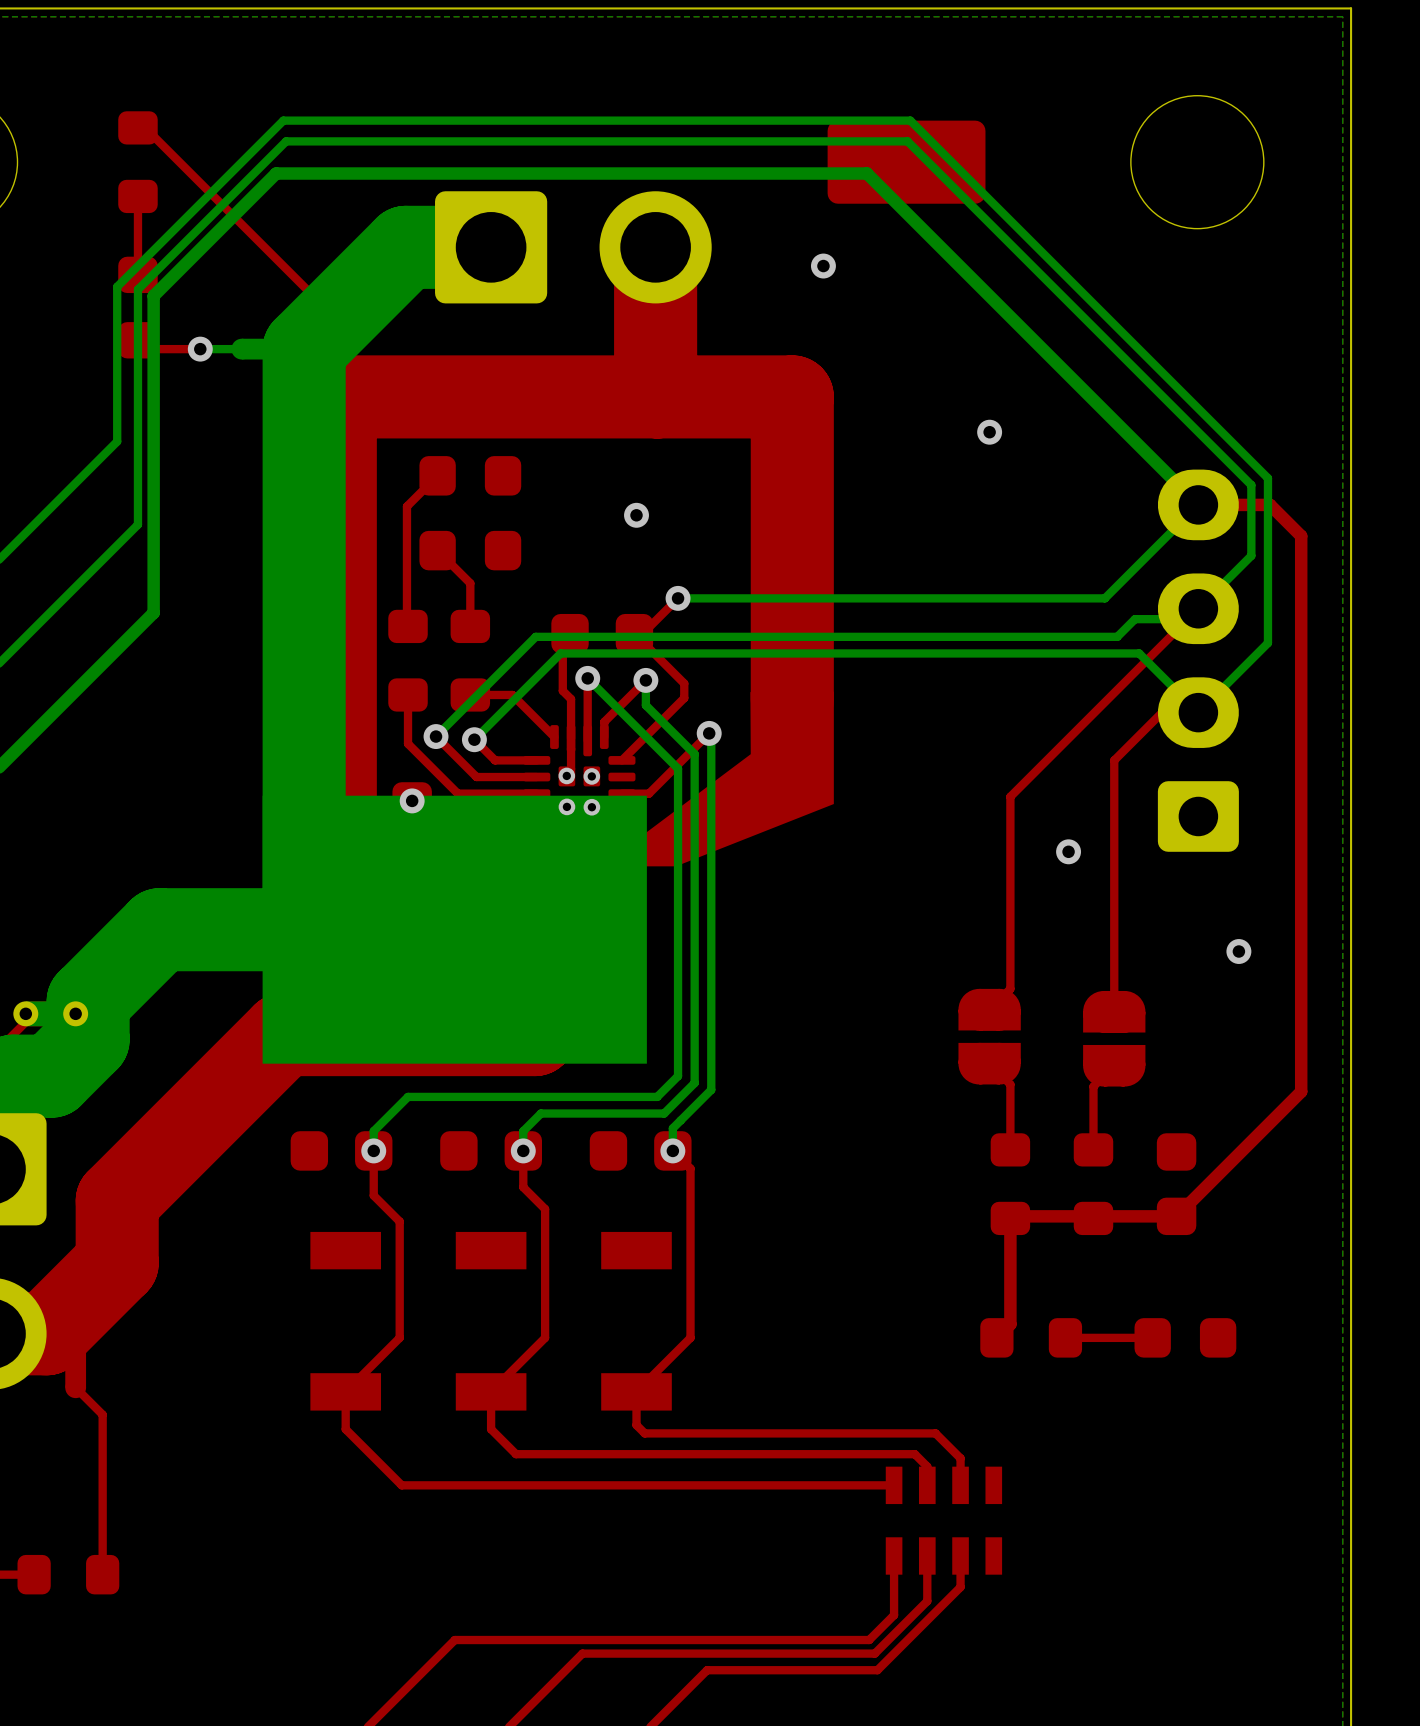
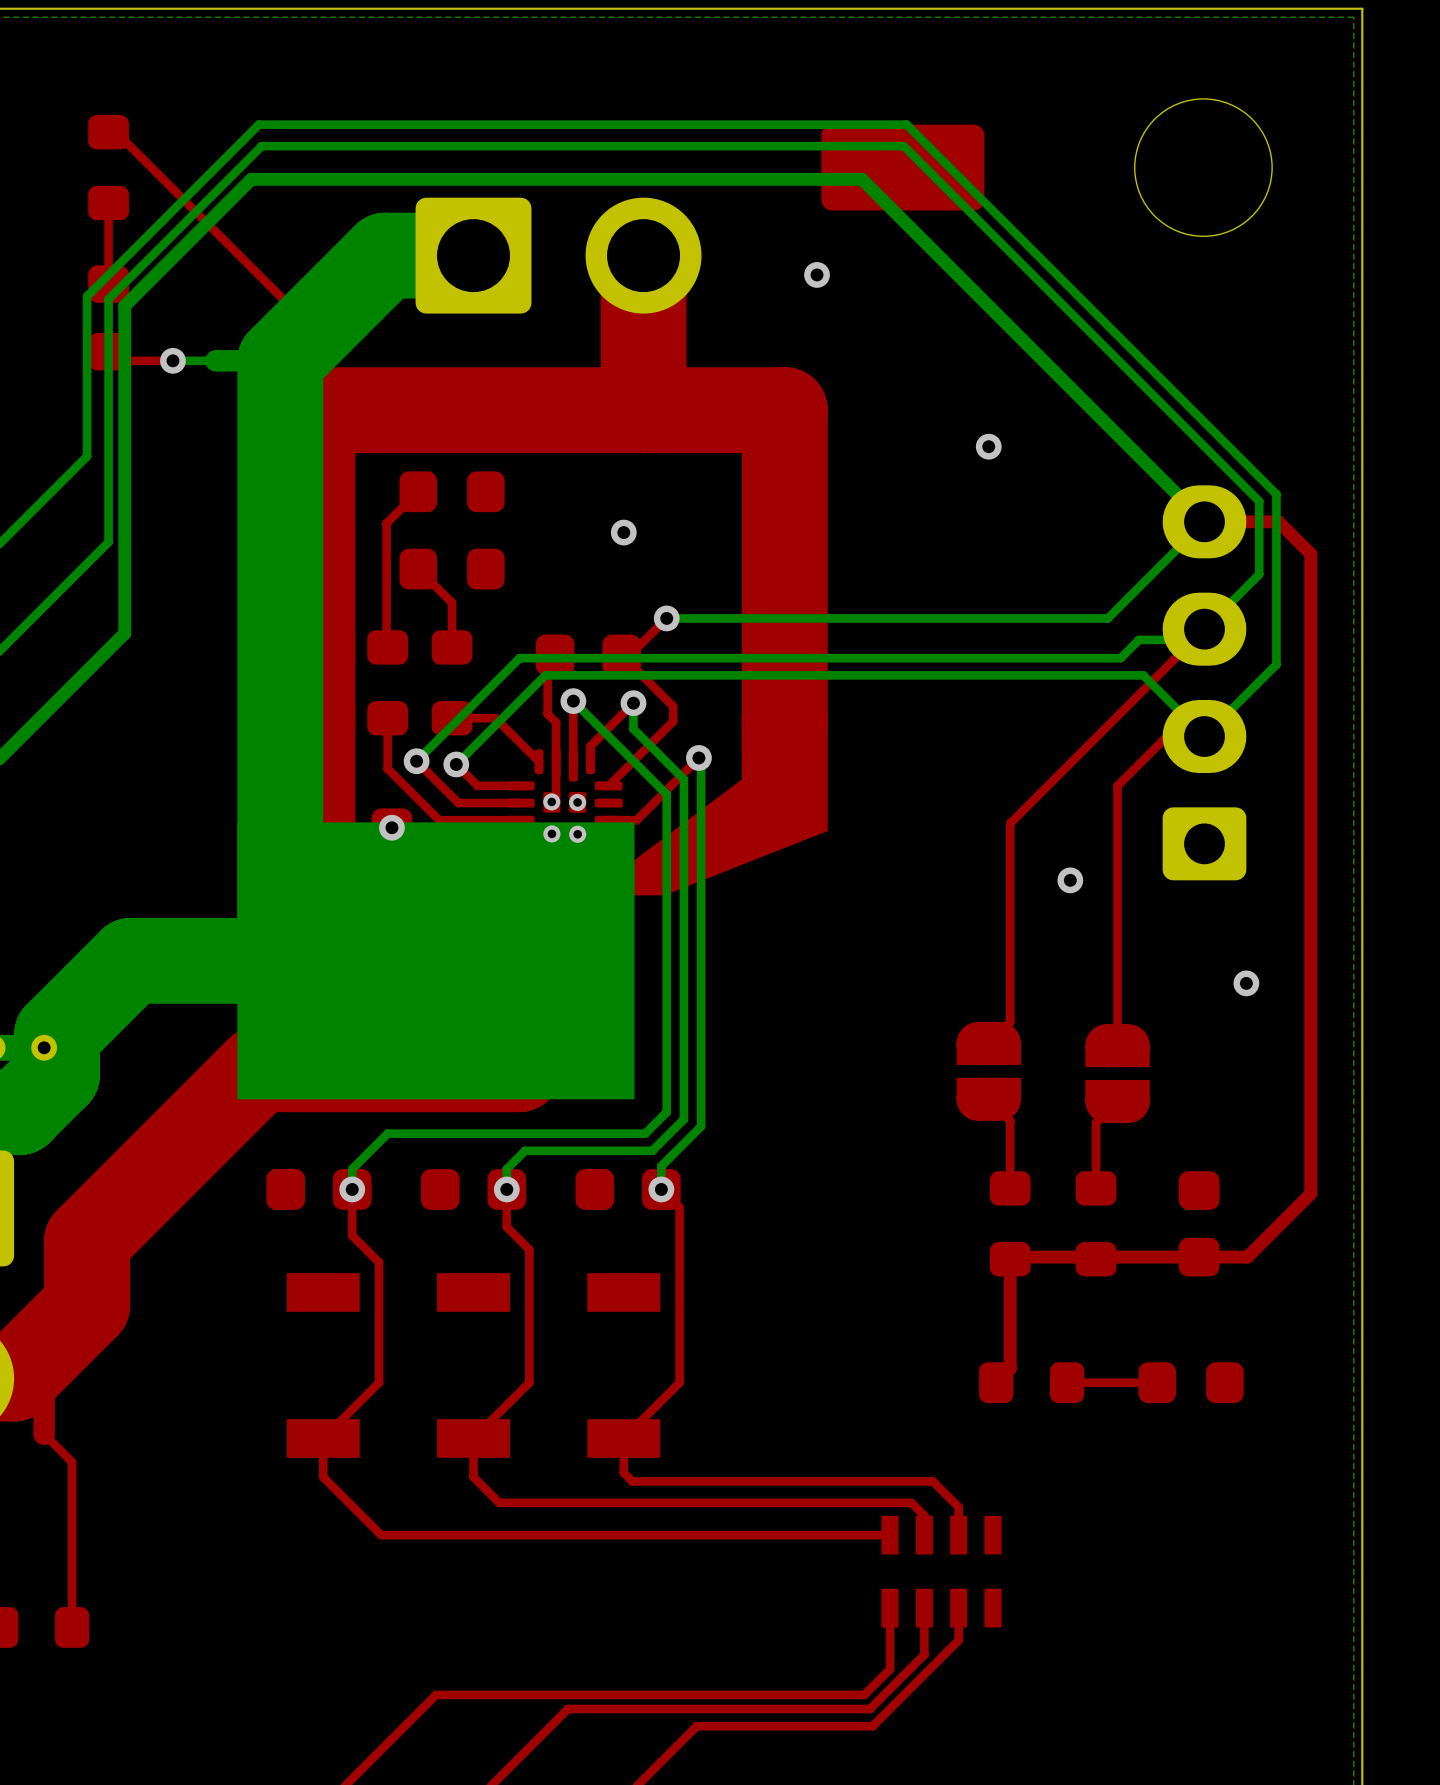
top track: (1301, 1091) (1176, 1216) -> (1310, 1128) (1310, 1193) (1247, 1257) (1181, 1257)
part position: (1176, 1184) -> (1199, 1223)

